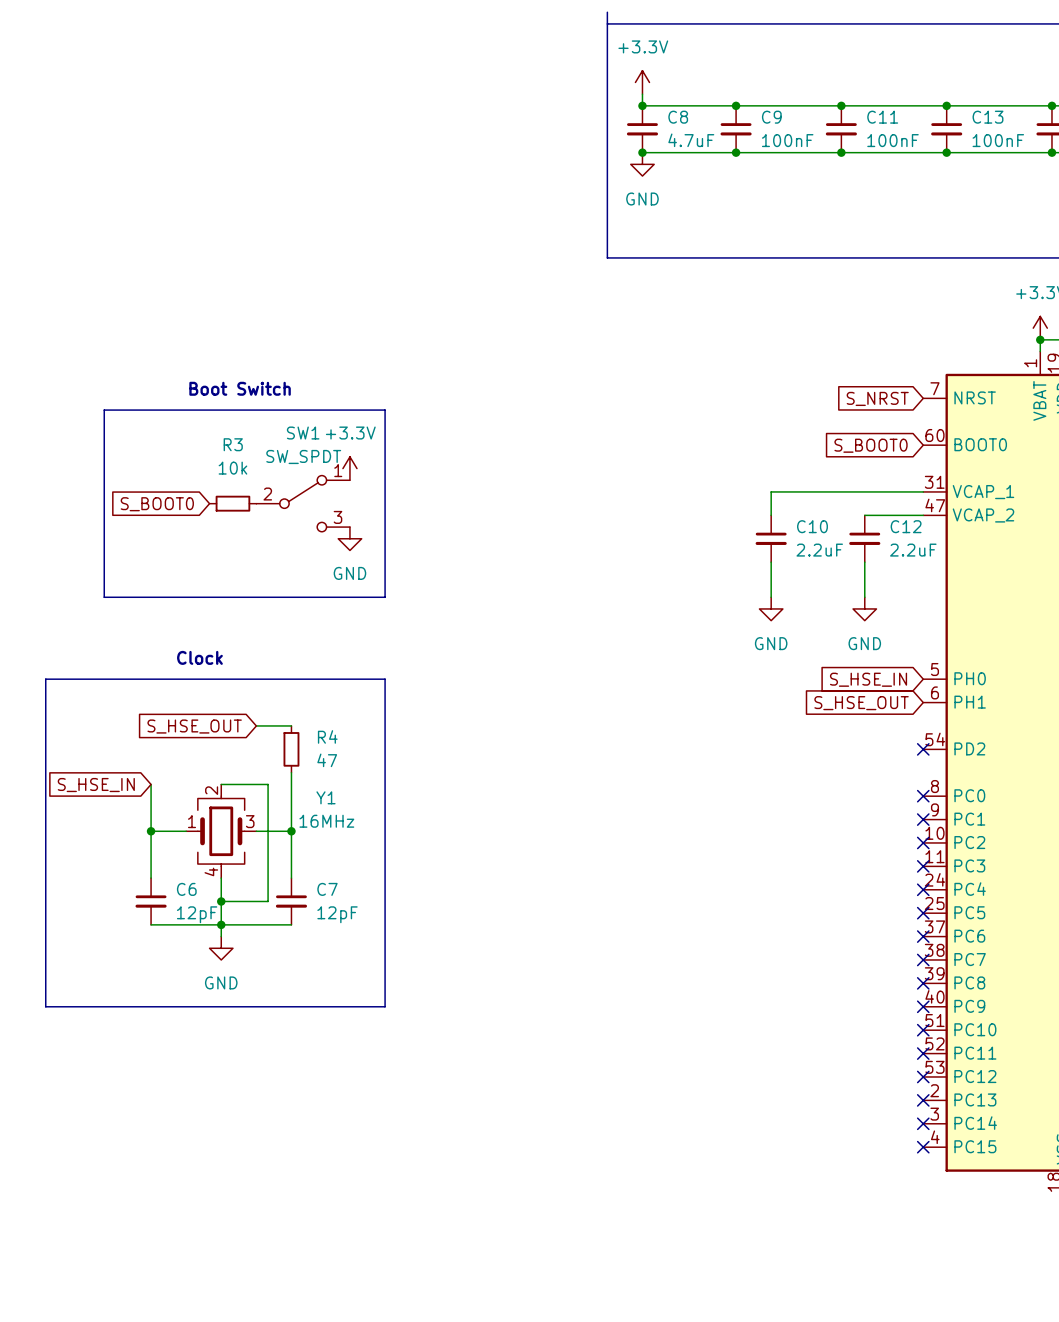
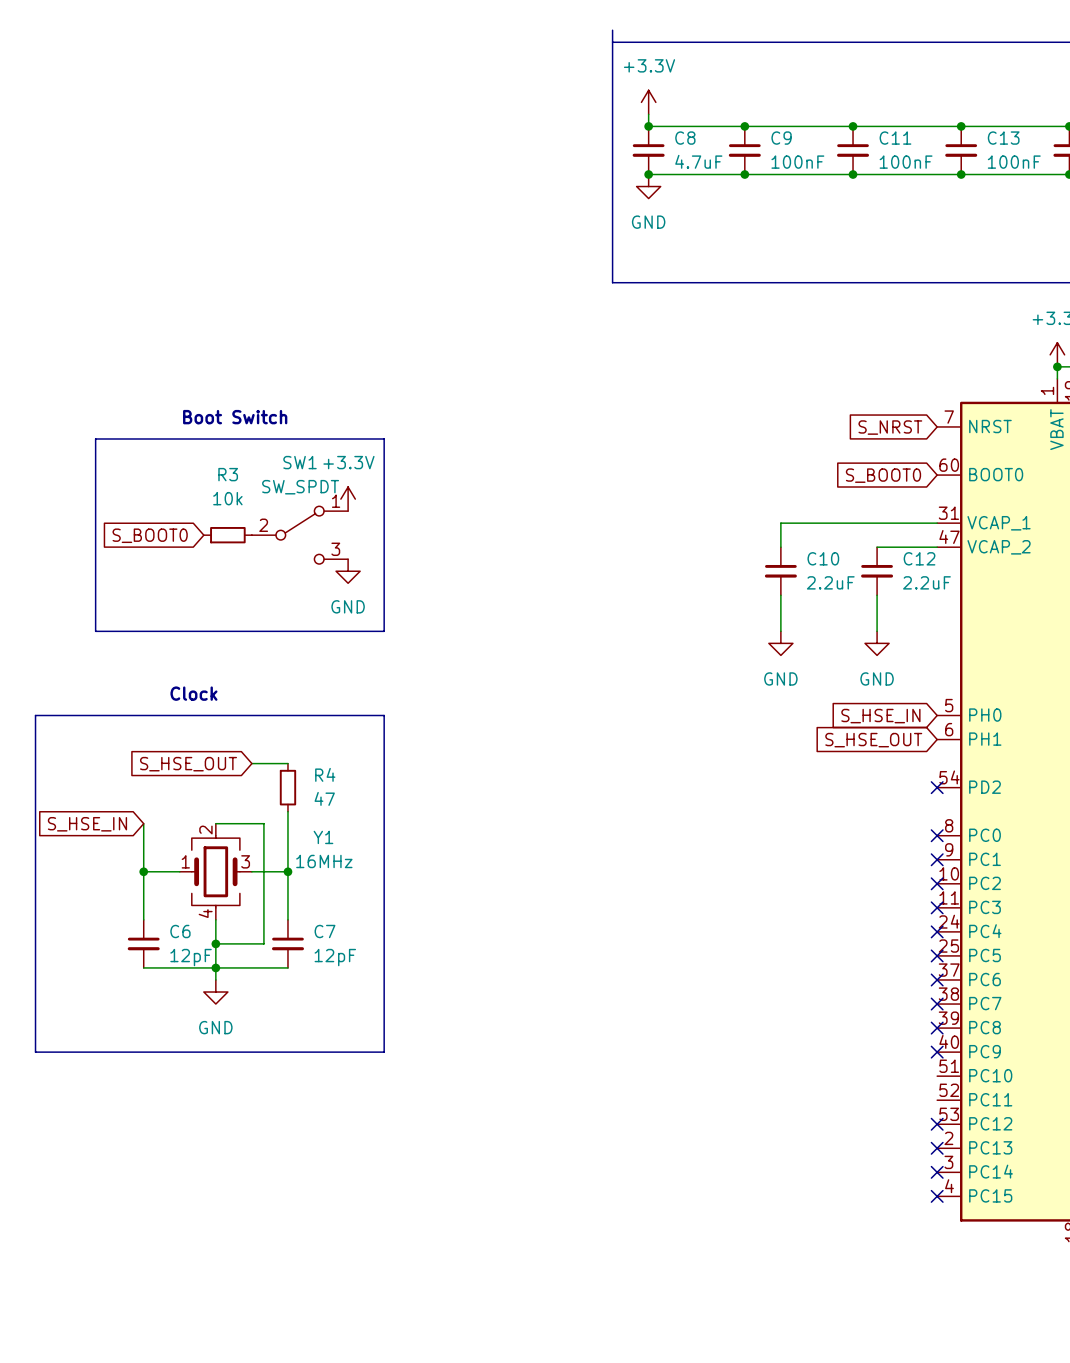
no-connect mark: (923, 1030) -> none
no-connect mark: (923, 1053) -> none

